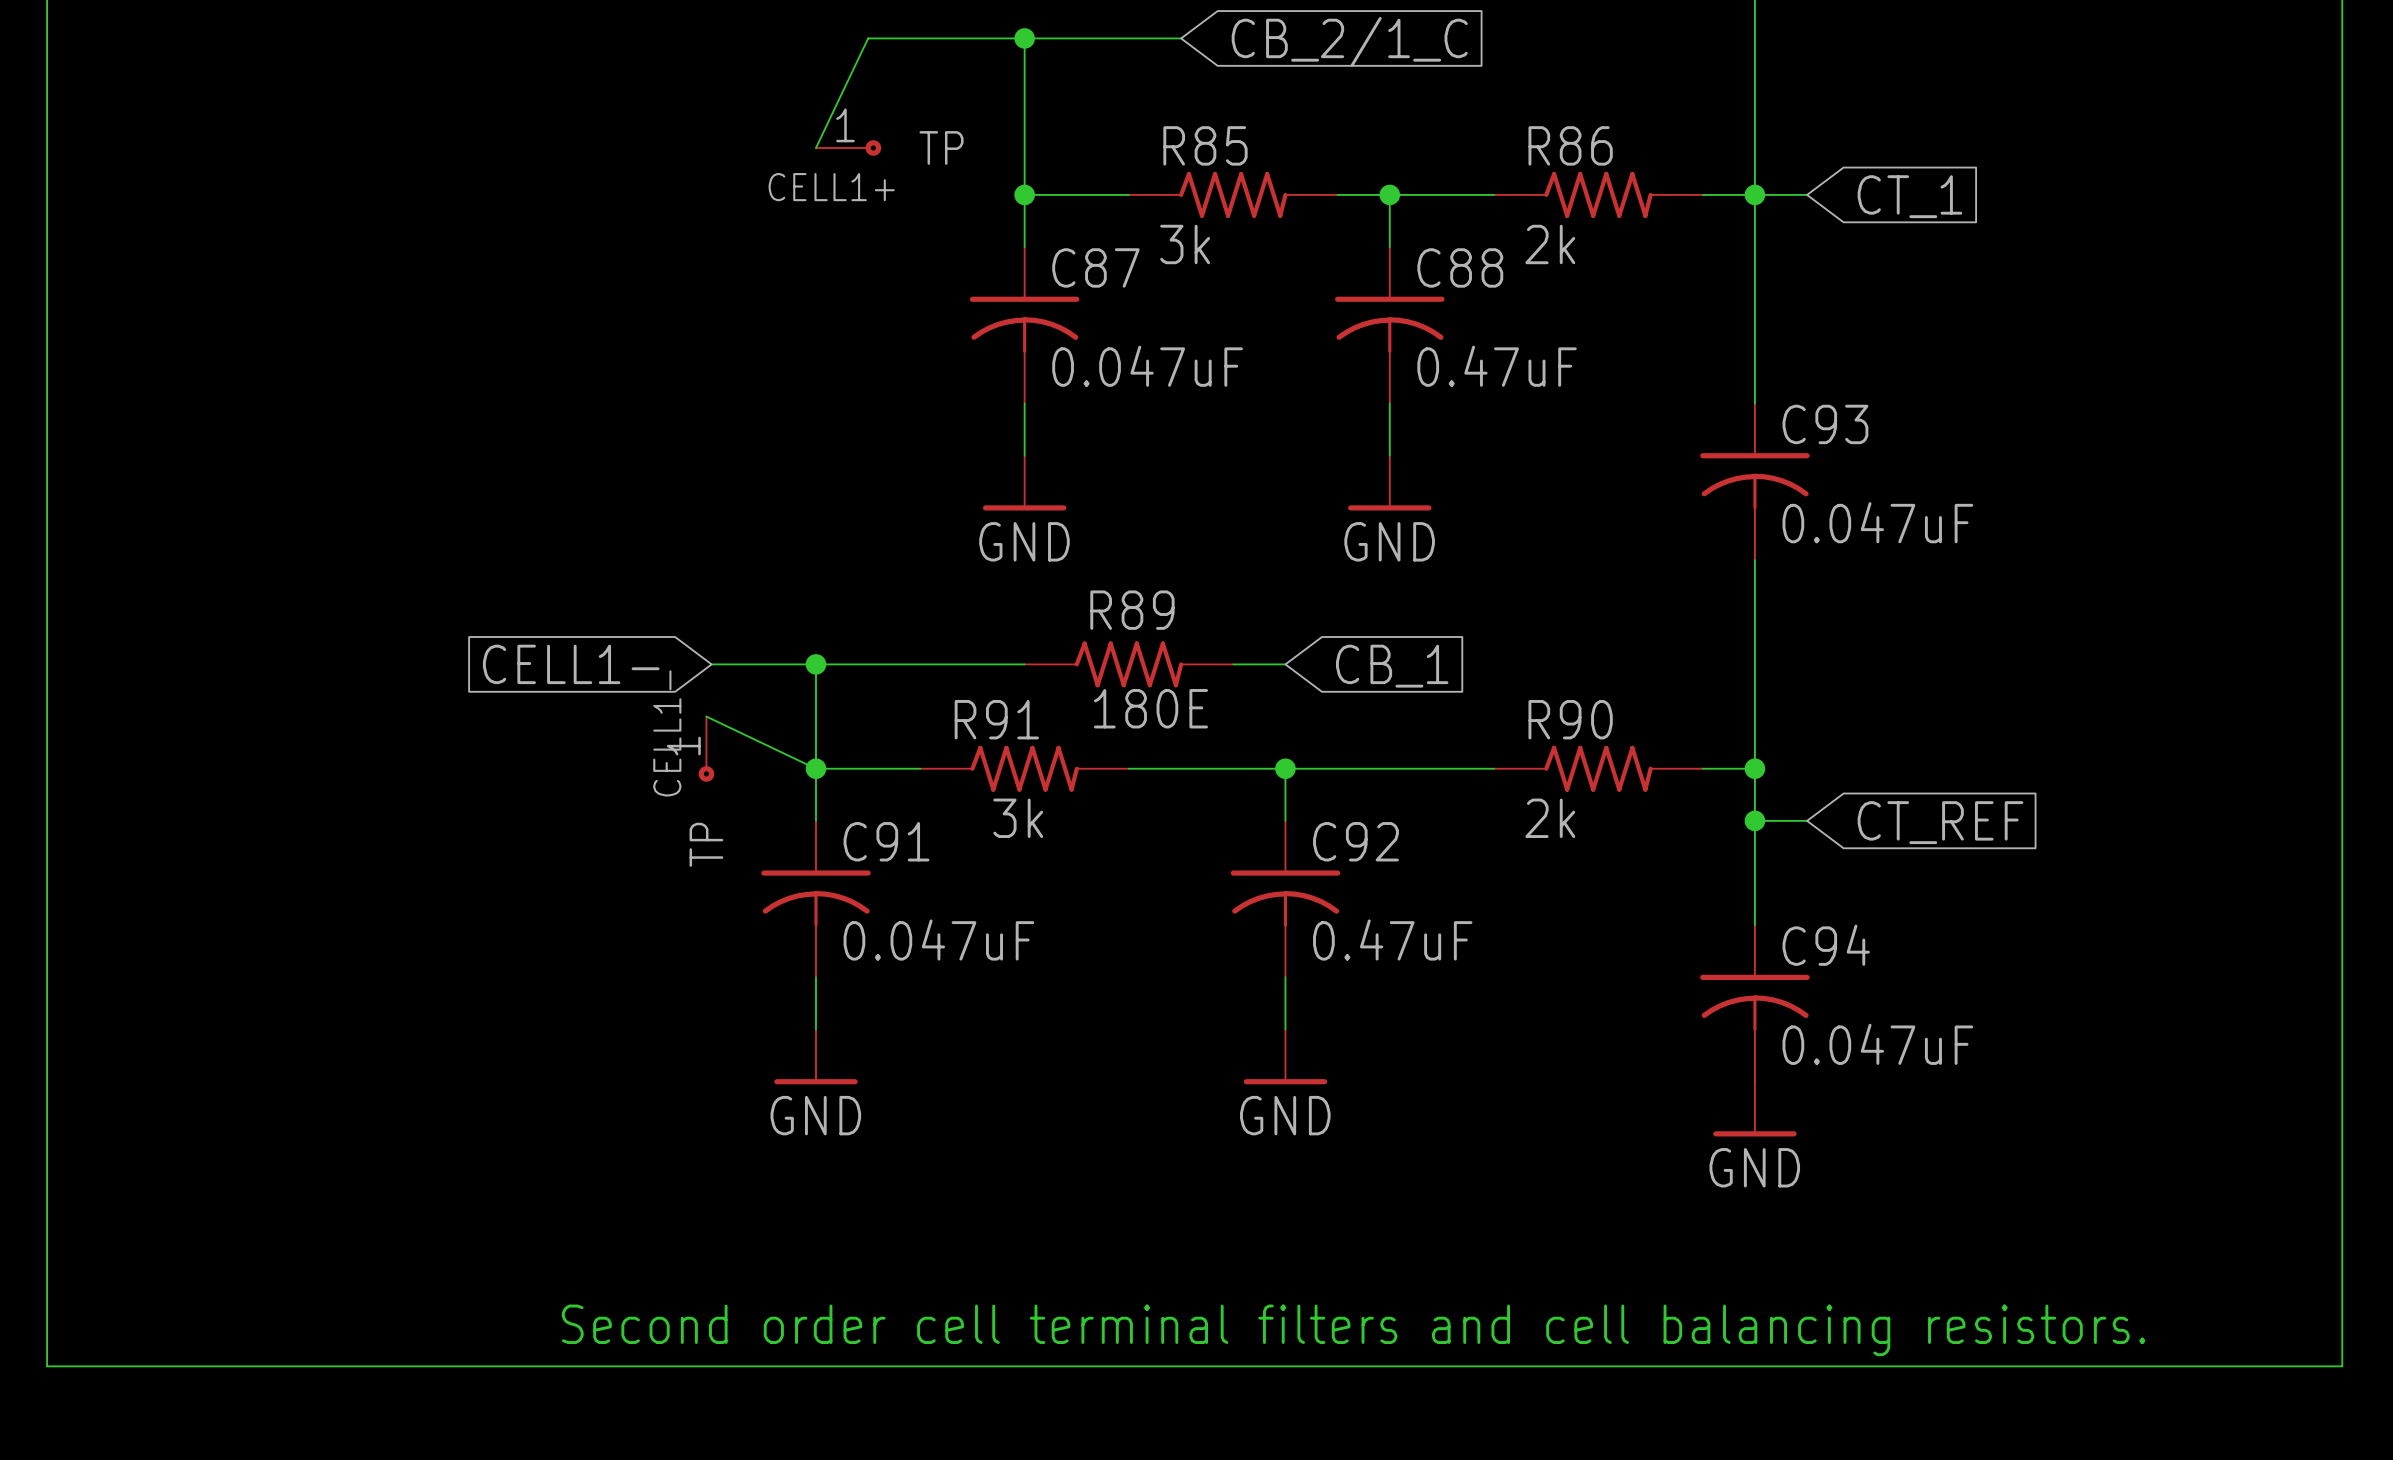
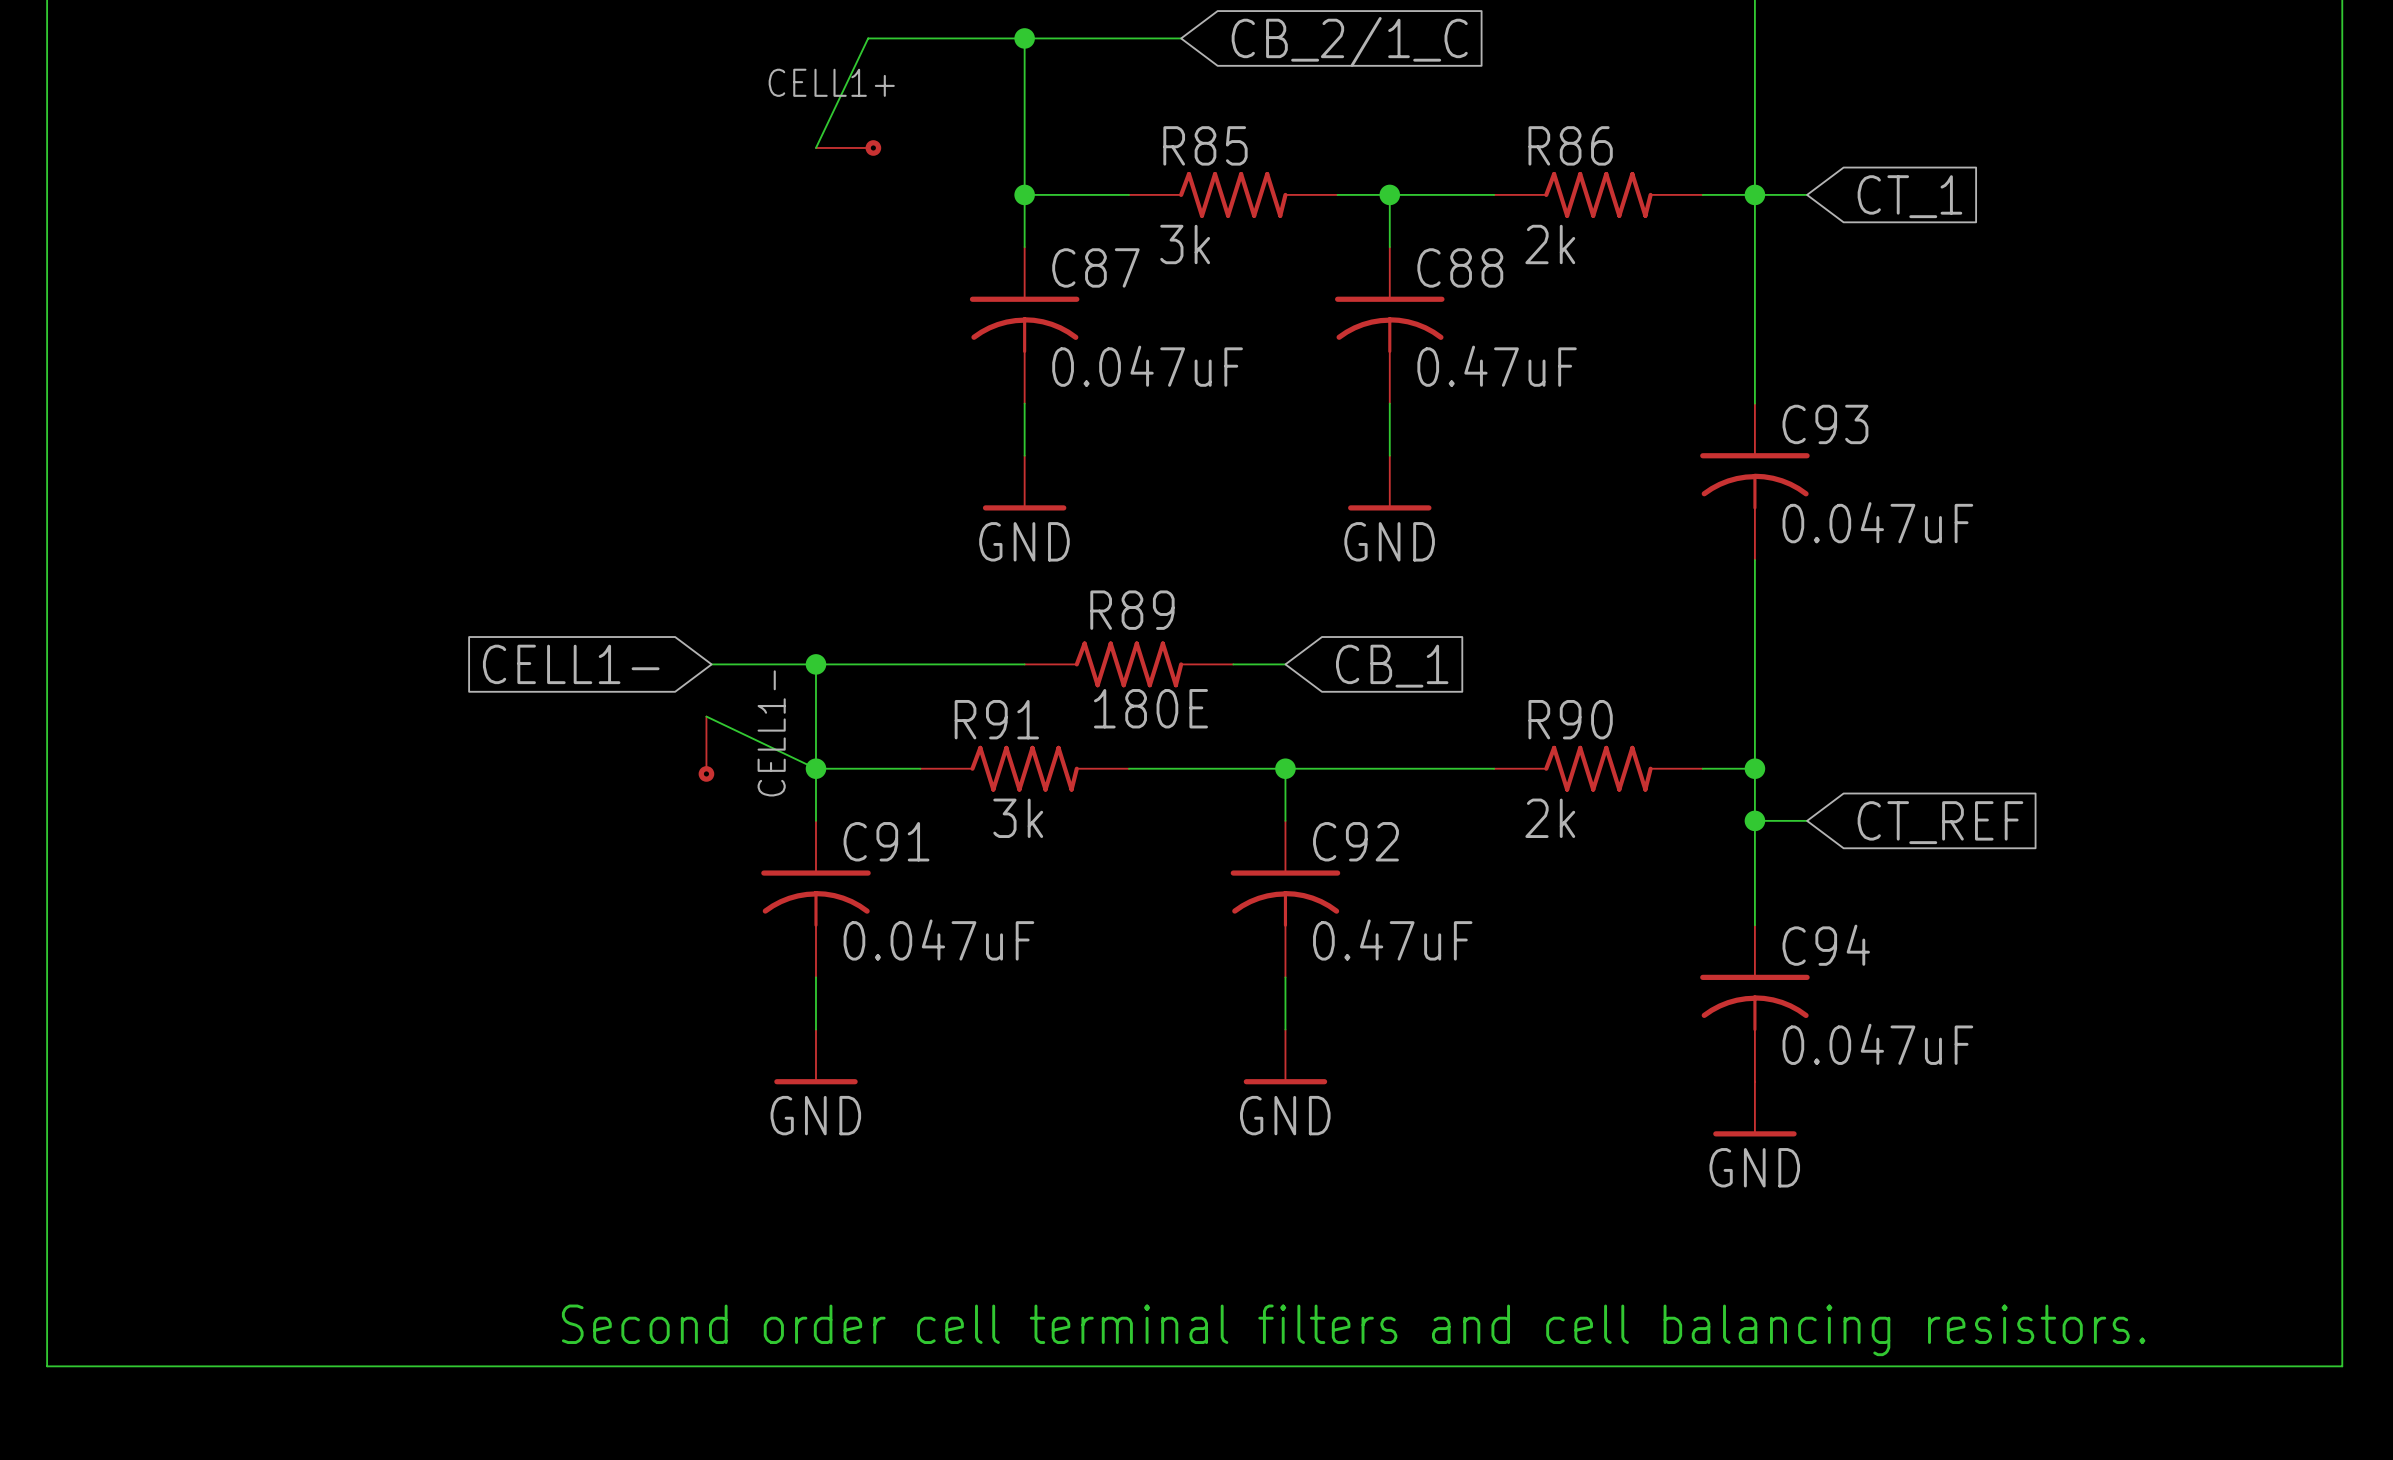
CELL1+ pin number: 1 (845, 125) -> none
CELL1+ pin name: TP (941, 147) -> none
CELL1+ name position: CELL1+ (831, 187) -> CELL1+ (831, 82)
CELL1- name position: CELL1- (667, 733) -> CELL1- (771, 733)
CELL1- pin number: 1 (683, 746) -> none
CELL1- pin name: TP (706, 844) -> none

